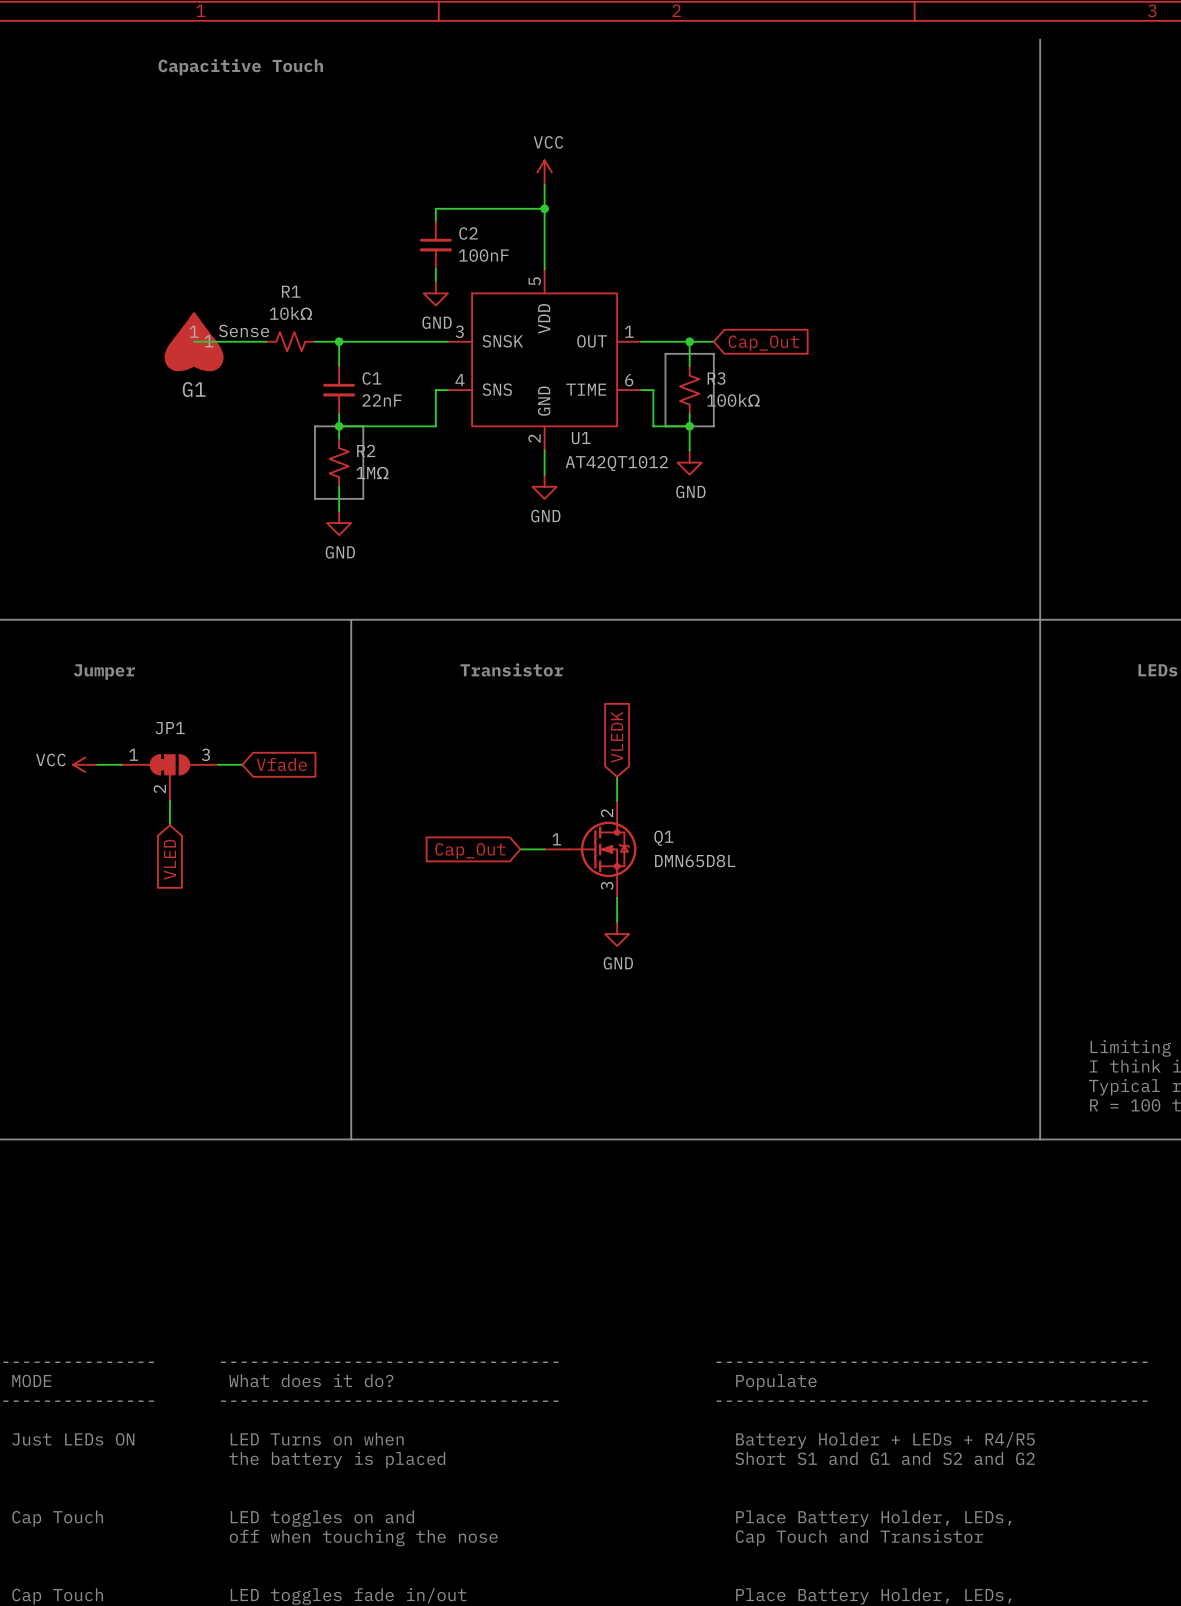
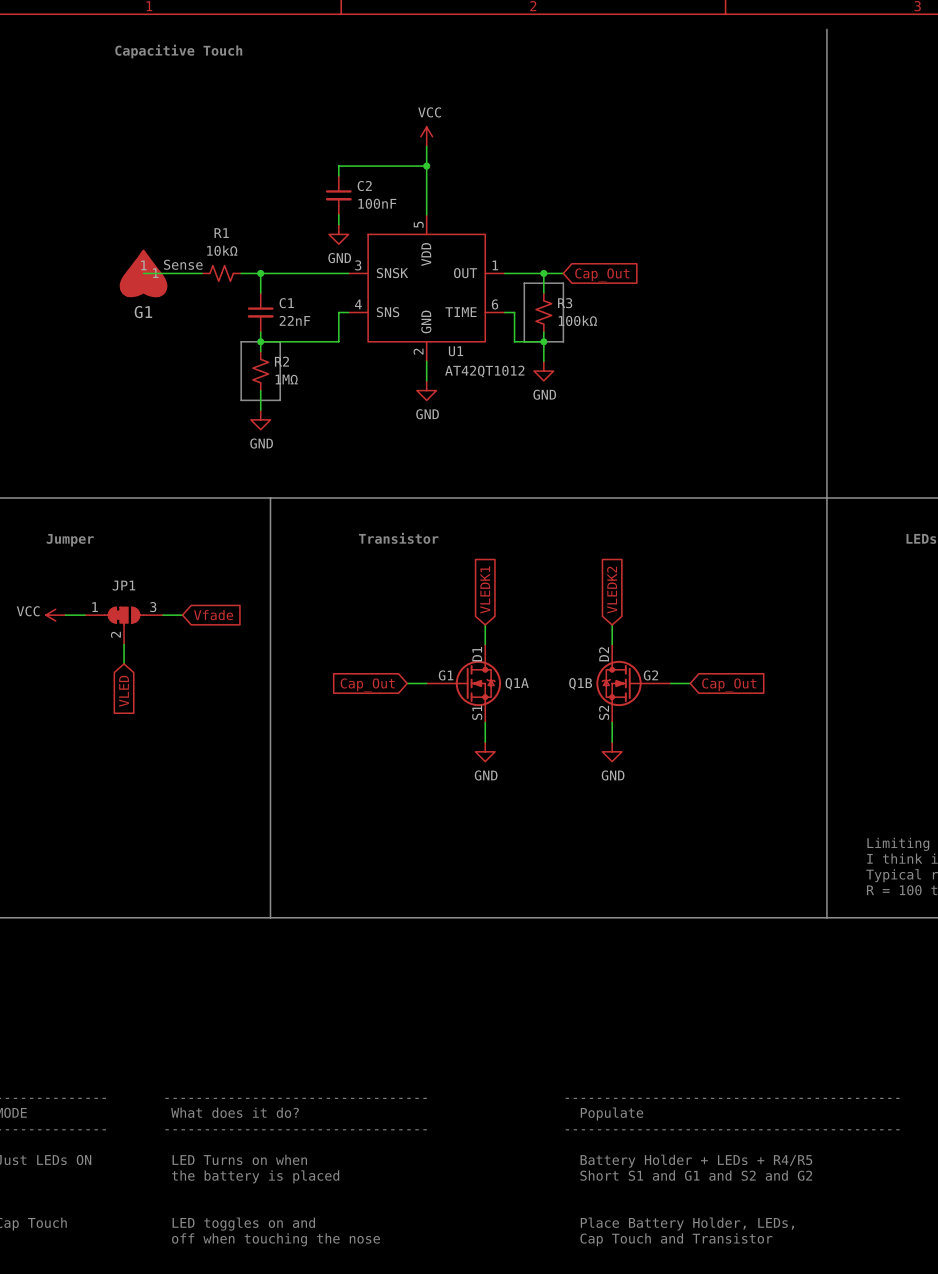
global label: none -> VLEDK2 (612, 590)
global label: VLEDK (617, 737) -> VLEDK1 (485, 590)
wire: none -> (612, 624) (612, 644)
Q1: DMN65D8L (590, 849) -> none
Q1A: none -> (463, 683)
Q1B: none -> (633, 683)
wire: none -> (670, 683) (690, 683)
global label: none -> Cap_Out (729, 684)
wire: none -> (612, 722) (612, 742)
power symbol: none -> GND (612, 751)

